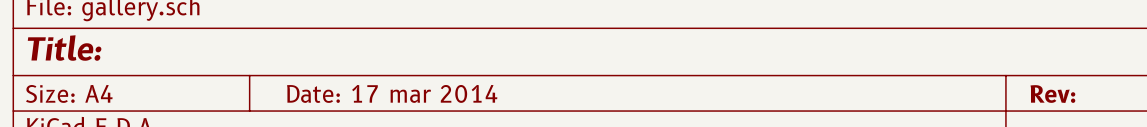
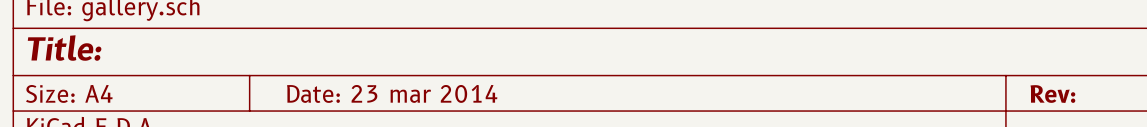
title block: Date: 17 mar 2014 (392, 93) -> Date: 23 mar 2014 (392, 93)

